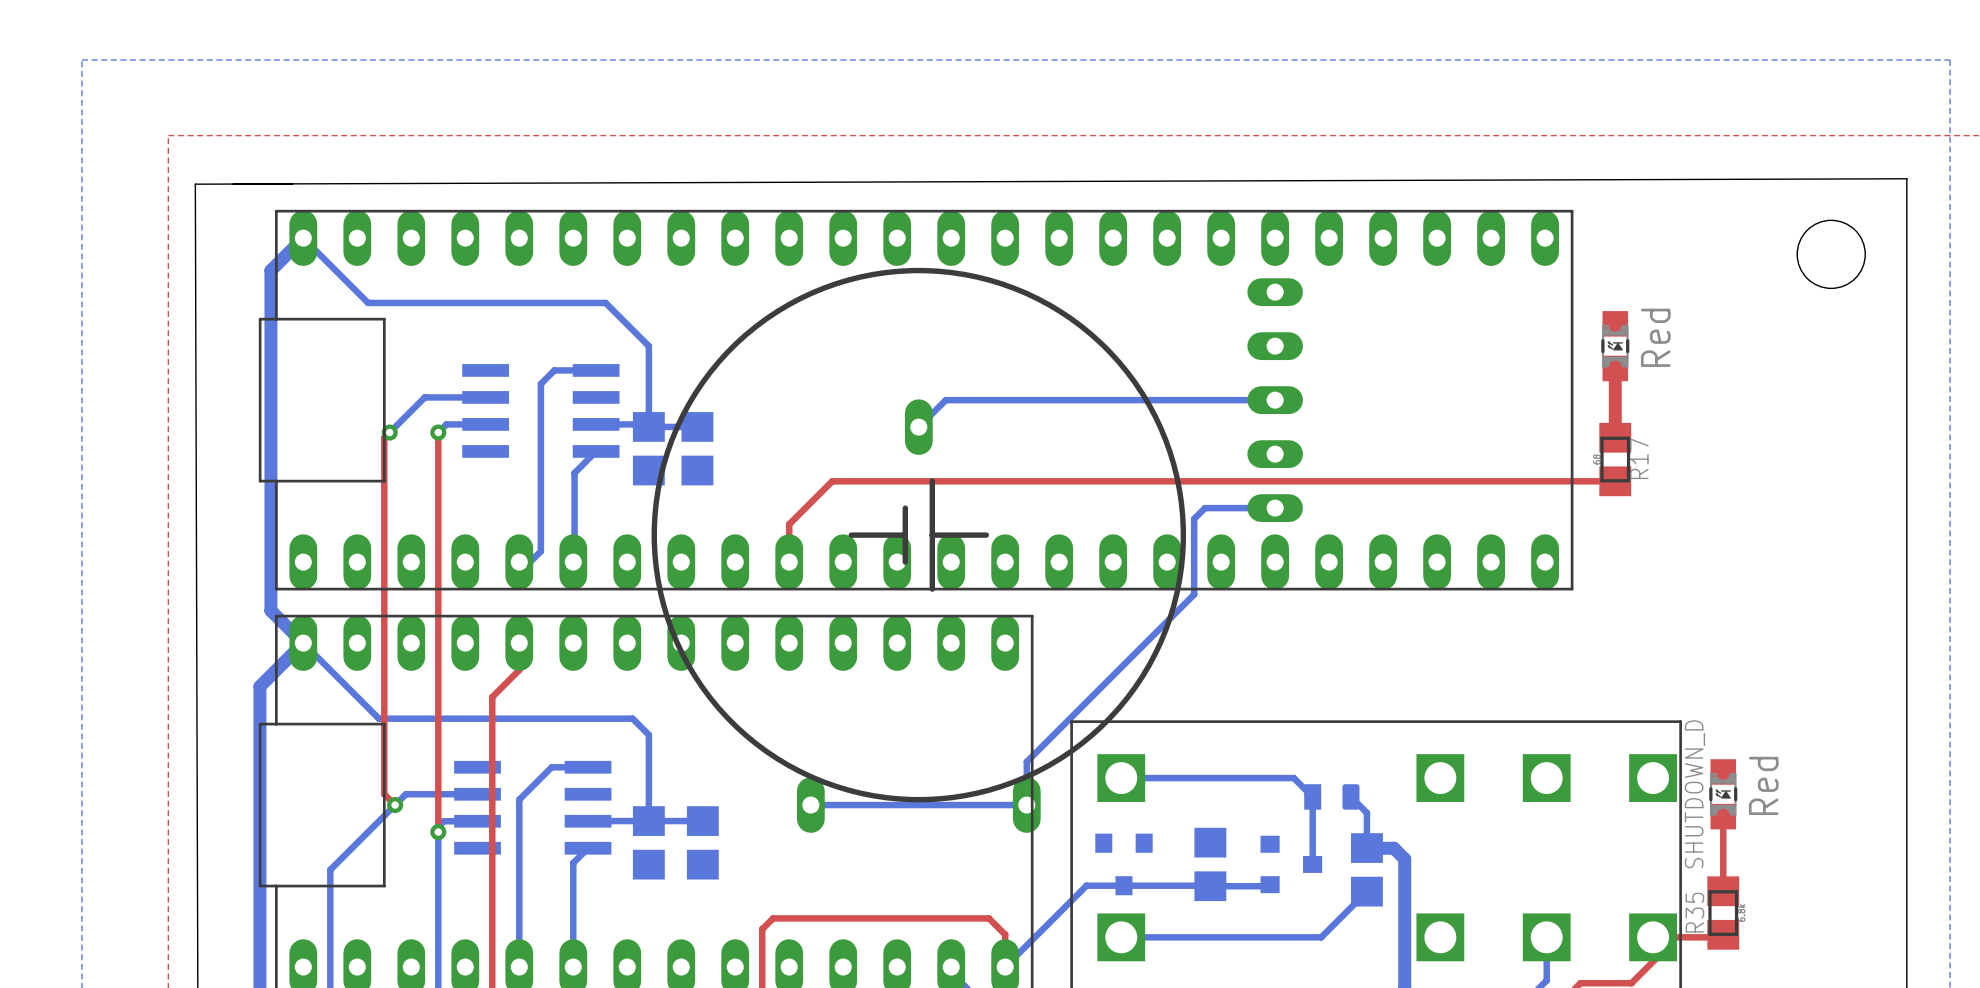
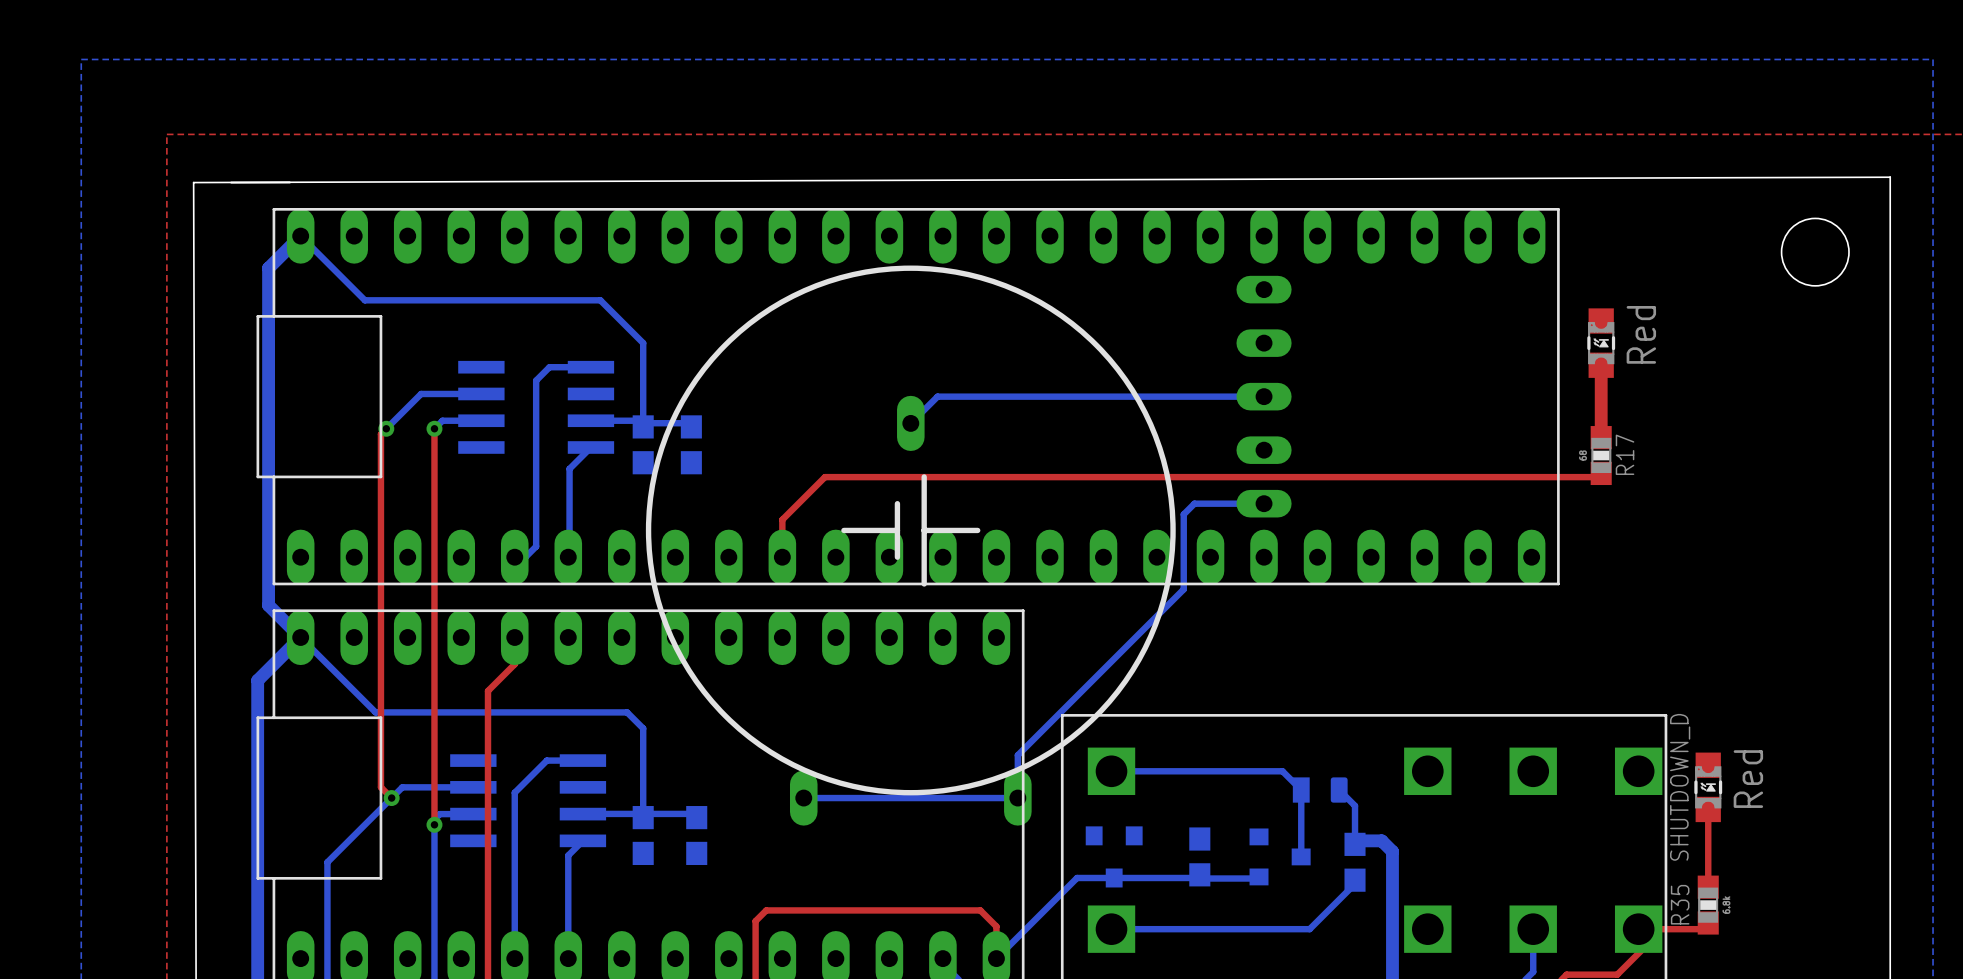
part footprint: [632, 412, 665, 486] -> [632, 415, 654, 475]
part footprint: [681, 412, 714, 486] -> [680, 415, 702, 475]
R17 footprint: [1599, 422, 1632, 497] -> [1590, 426, 1612, 486]
part footprint: [632, 806, 665, 880] -> [632, 806, 654, 866]
part footprint: [686, 806, 719, 880] -> [686, 806, 708, 866]
part footprint: [1194, 827, 1227, 902] -> [1189, 827, 1211, 887]
part footprint: [1350, 833, 1383, 907] -> [1344, 832, 1366, 892]
R35 footprint: [1707, 876, 1740, 950] -> [1697, 875, 1719, 935]

